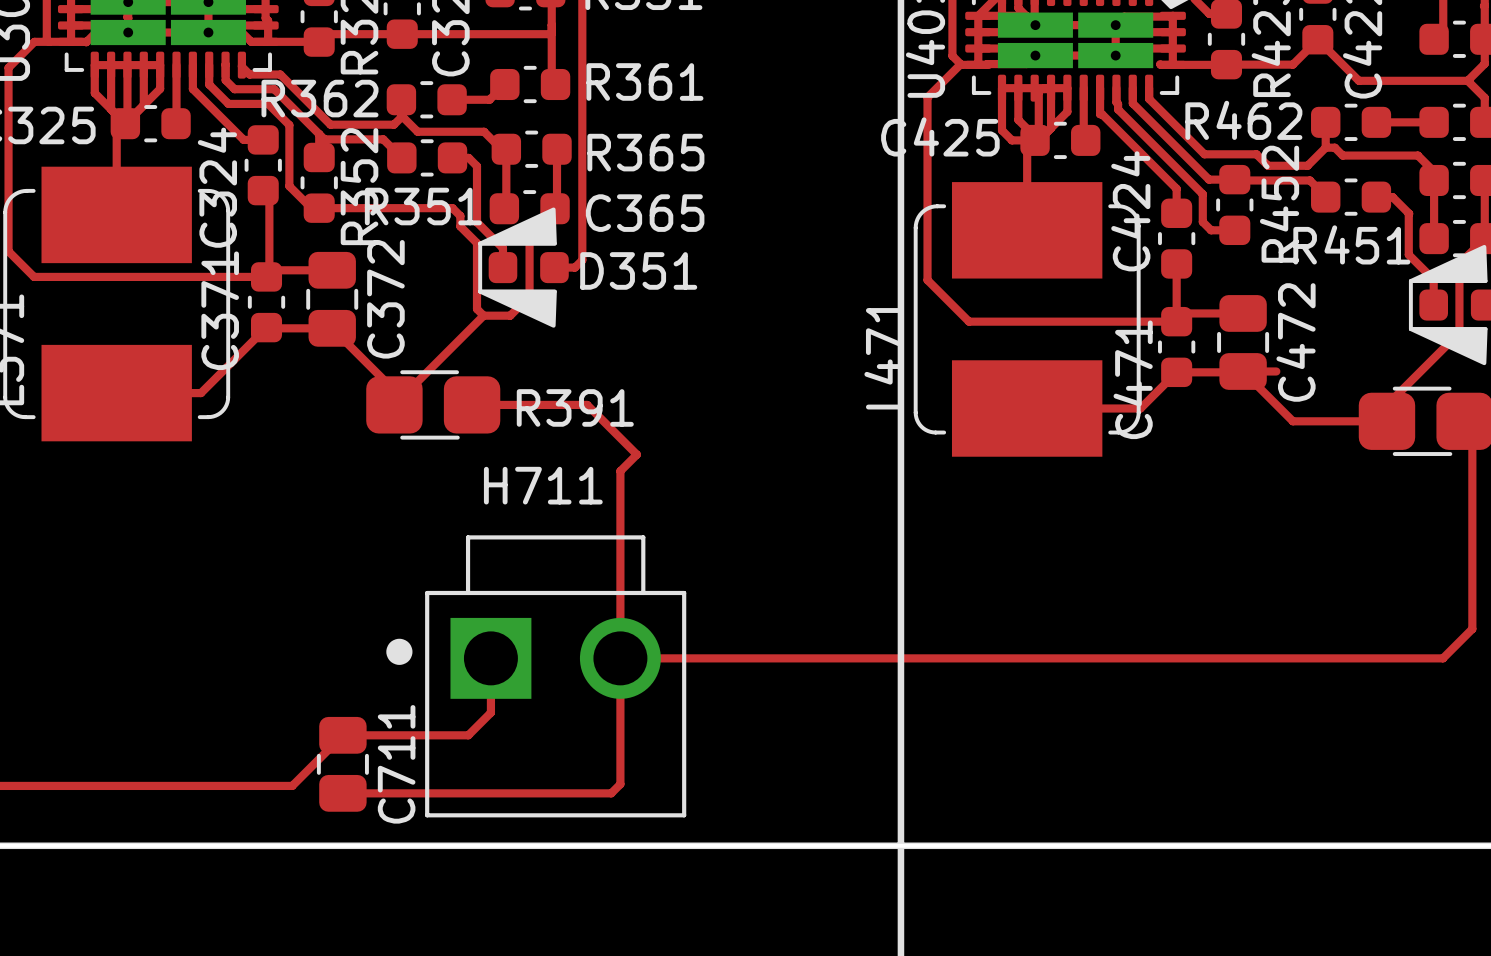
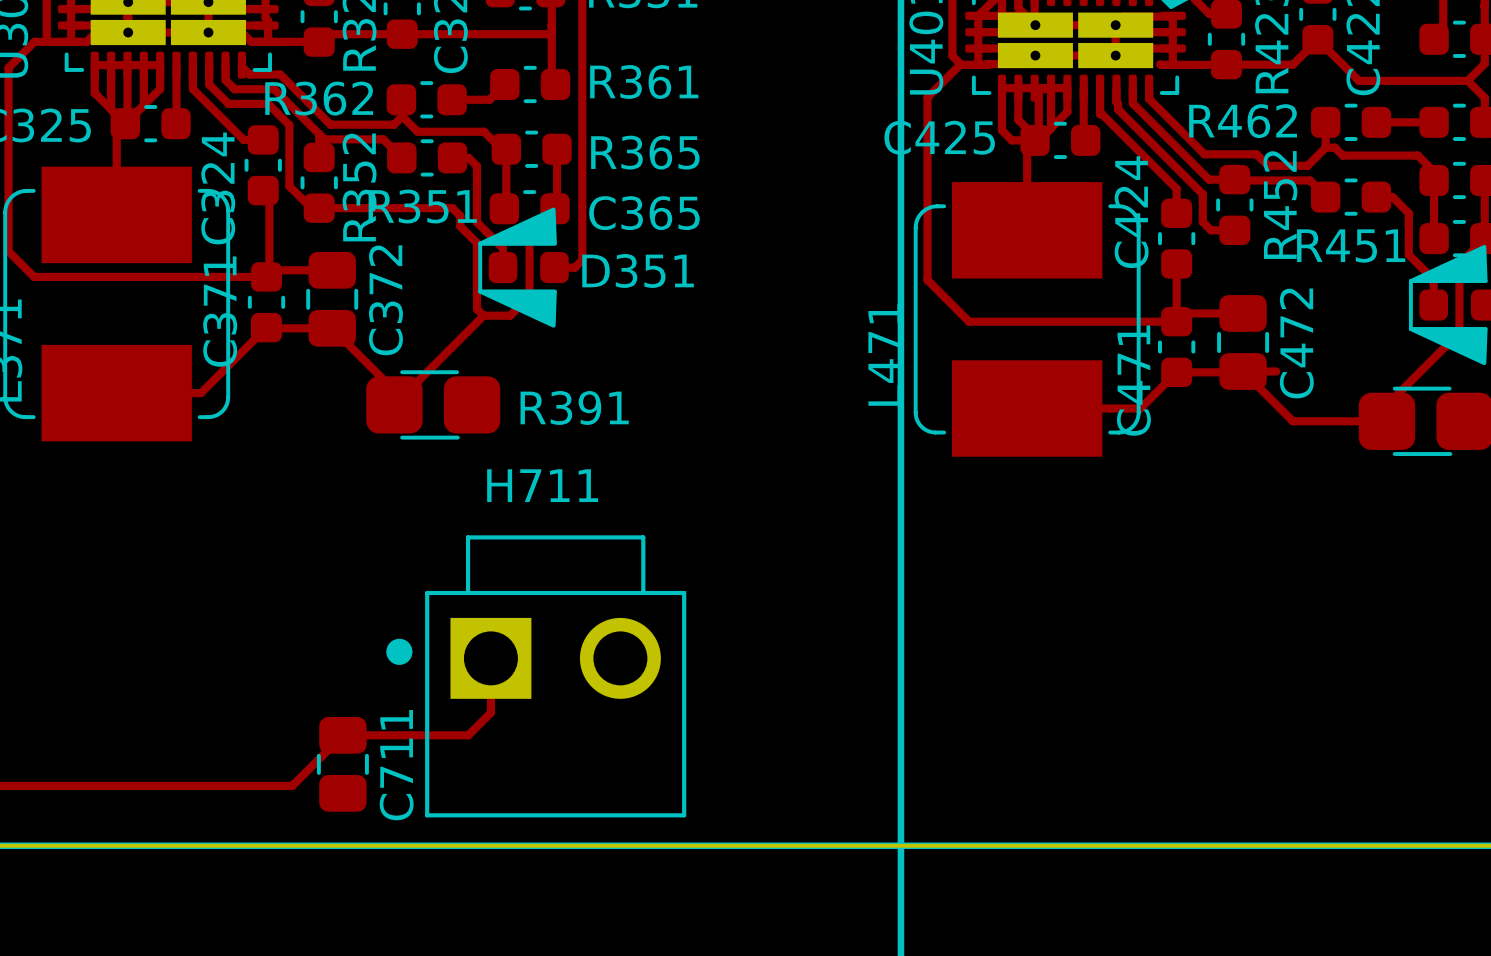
track: (472, 404) (587, 404) (636, 454) (620, 471) (620, 784) (611, 793) (342, 793) -> none
track: (1464, 421) (1472, 429) (1472, 629) (1443, 658) (620, 658) -> none

